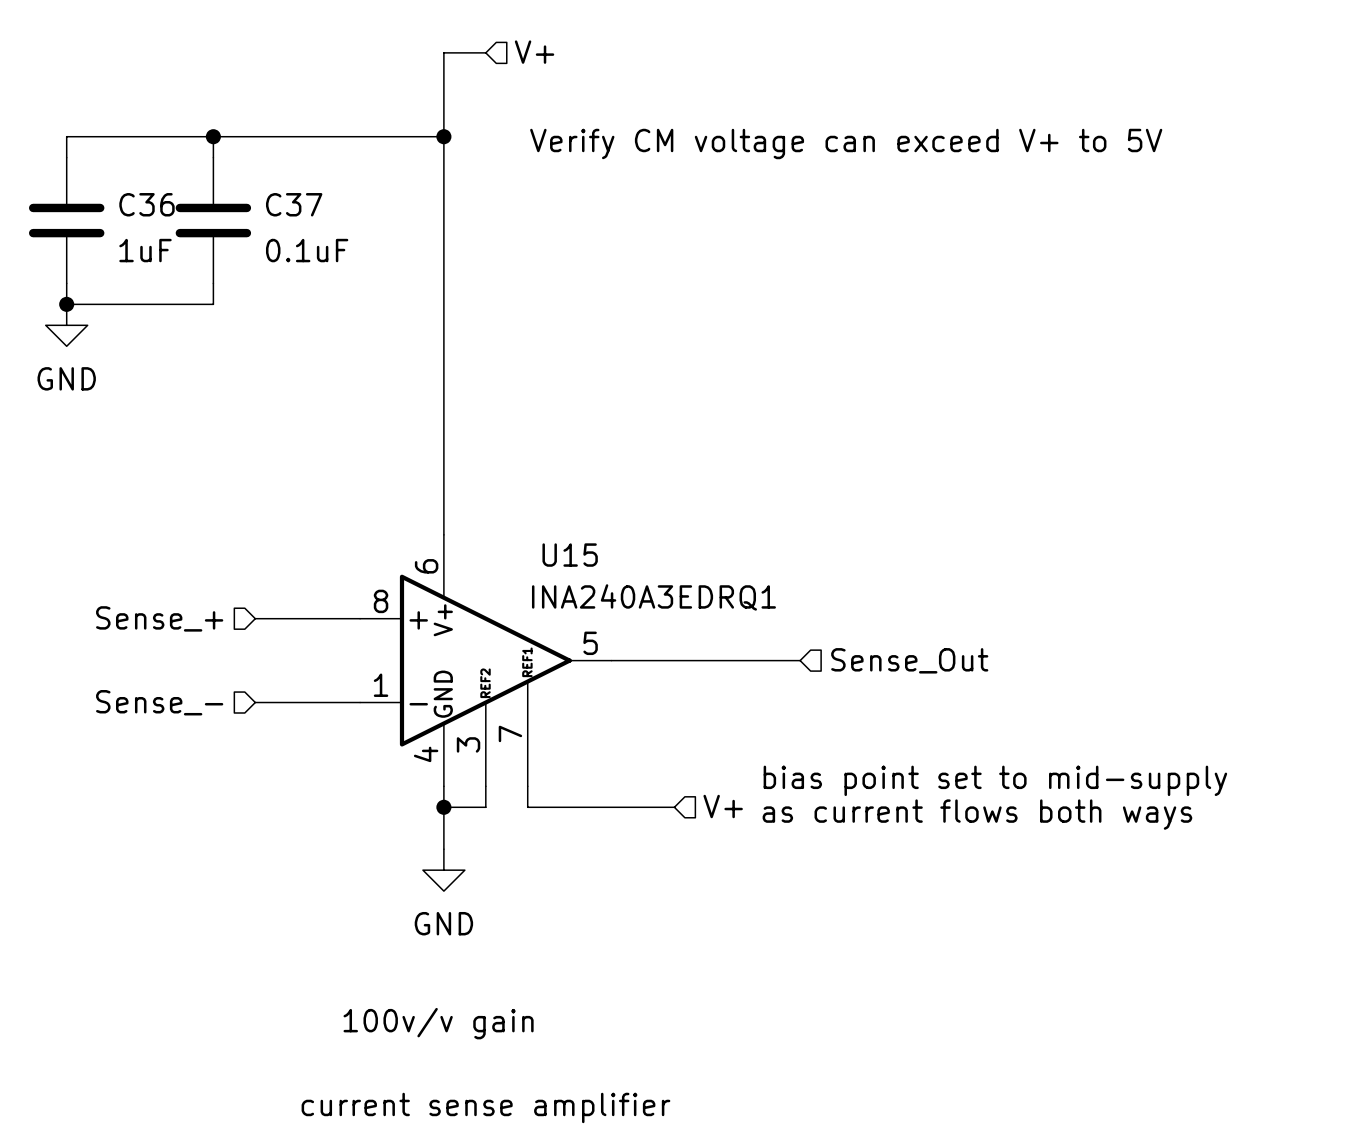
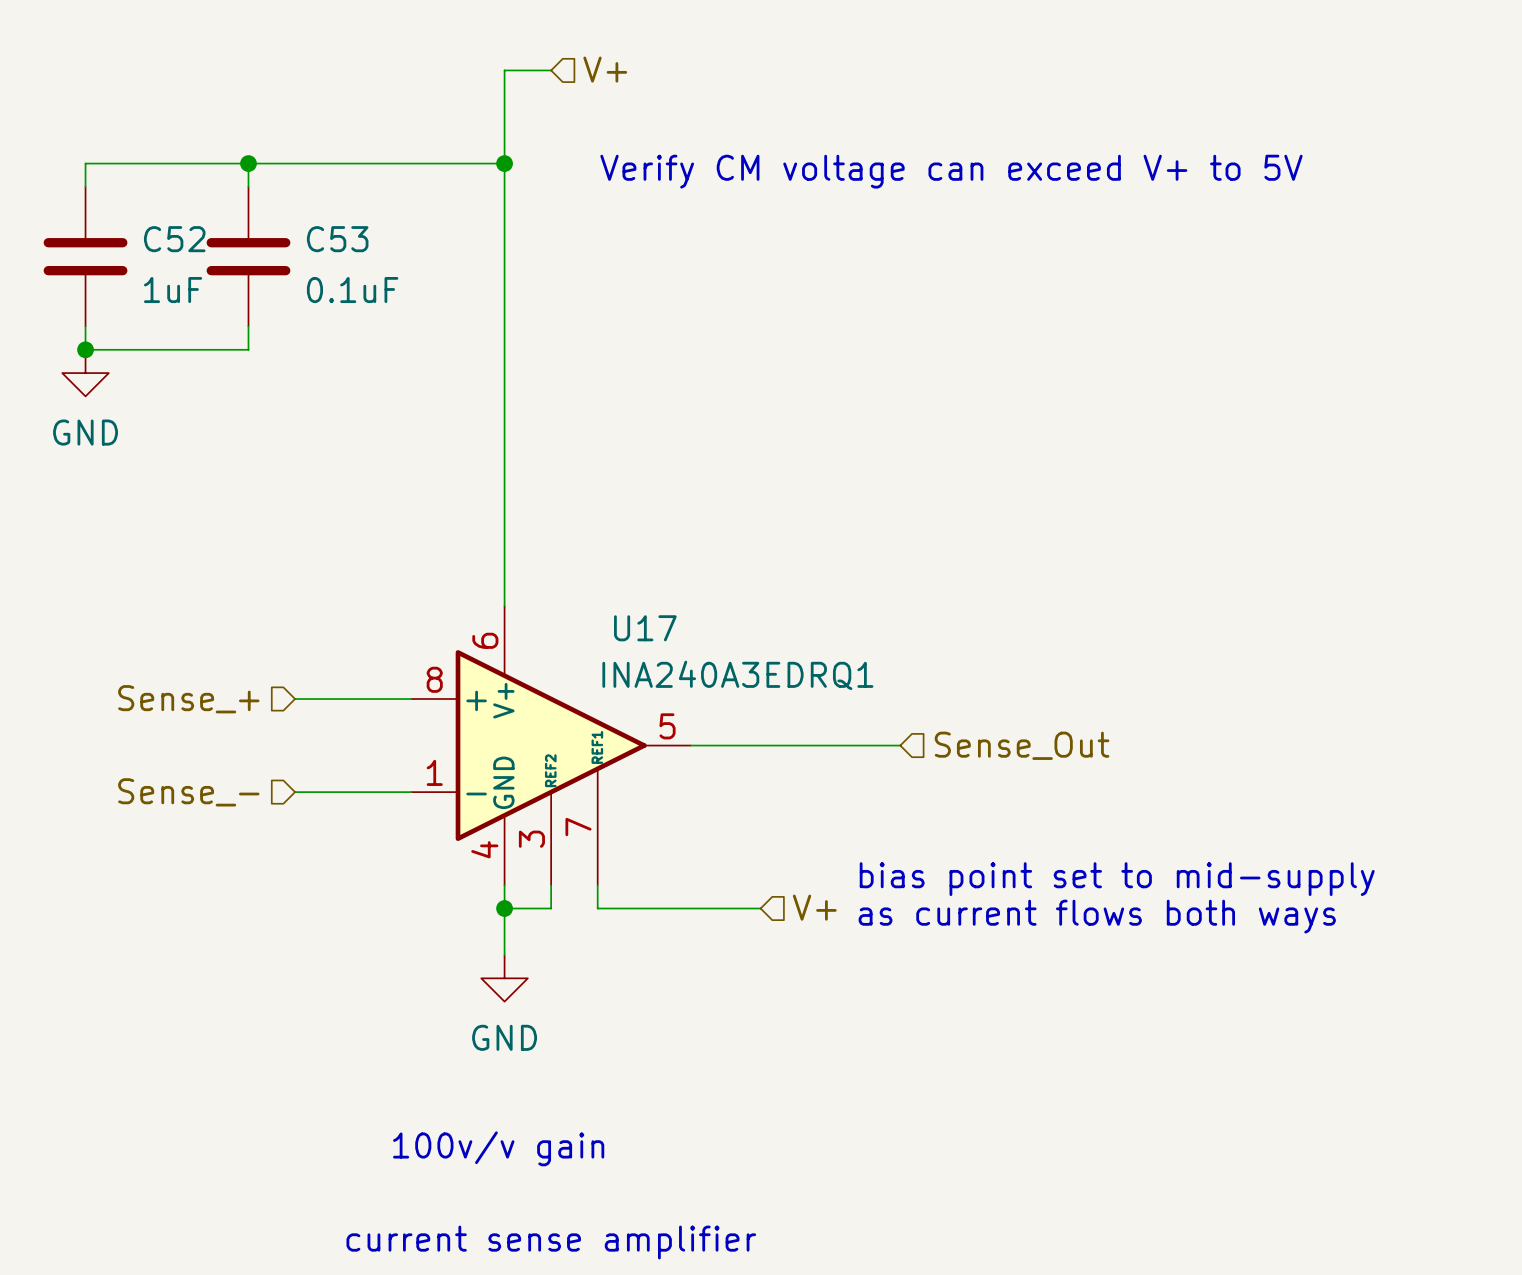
C36 name: C36 (146, 204) -> C52 (174, 239)
C37 name: C37 (294, 204) -> C53 (337, 239)
U15 name: U15 (570, 555) -> U17 (645, 628)

